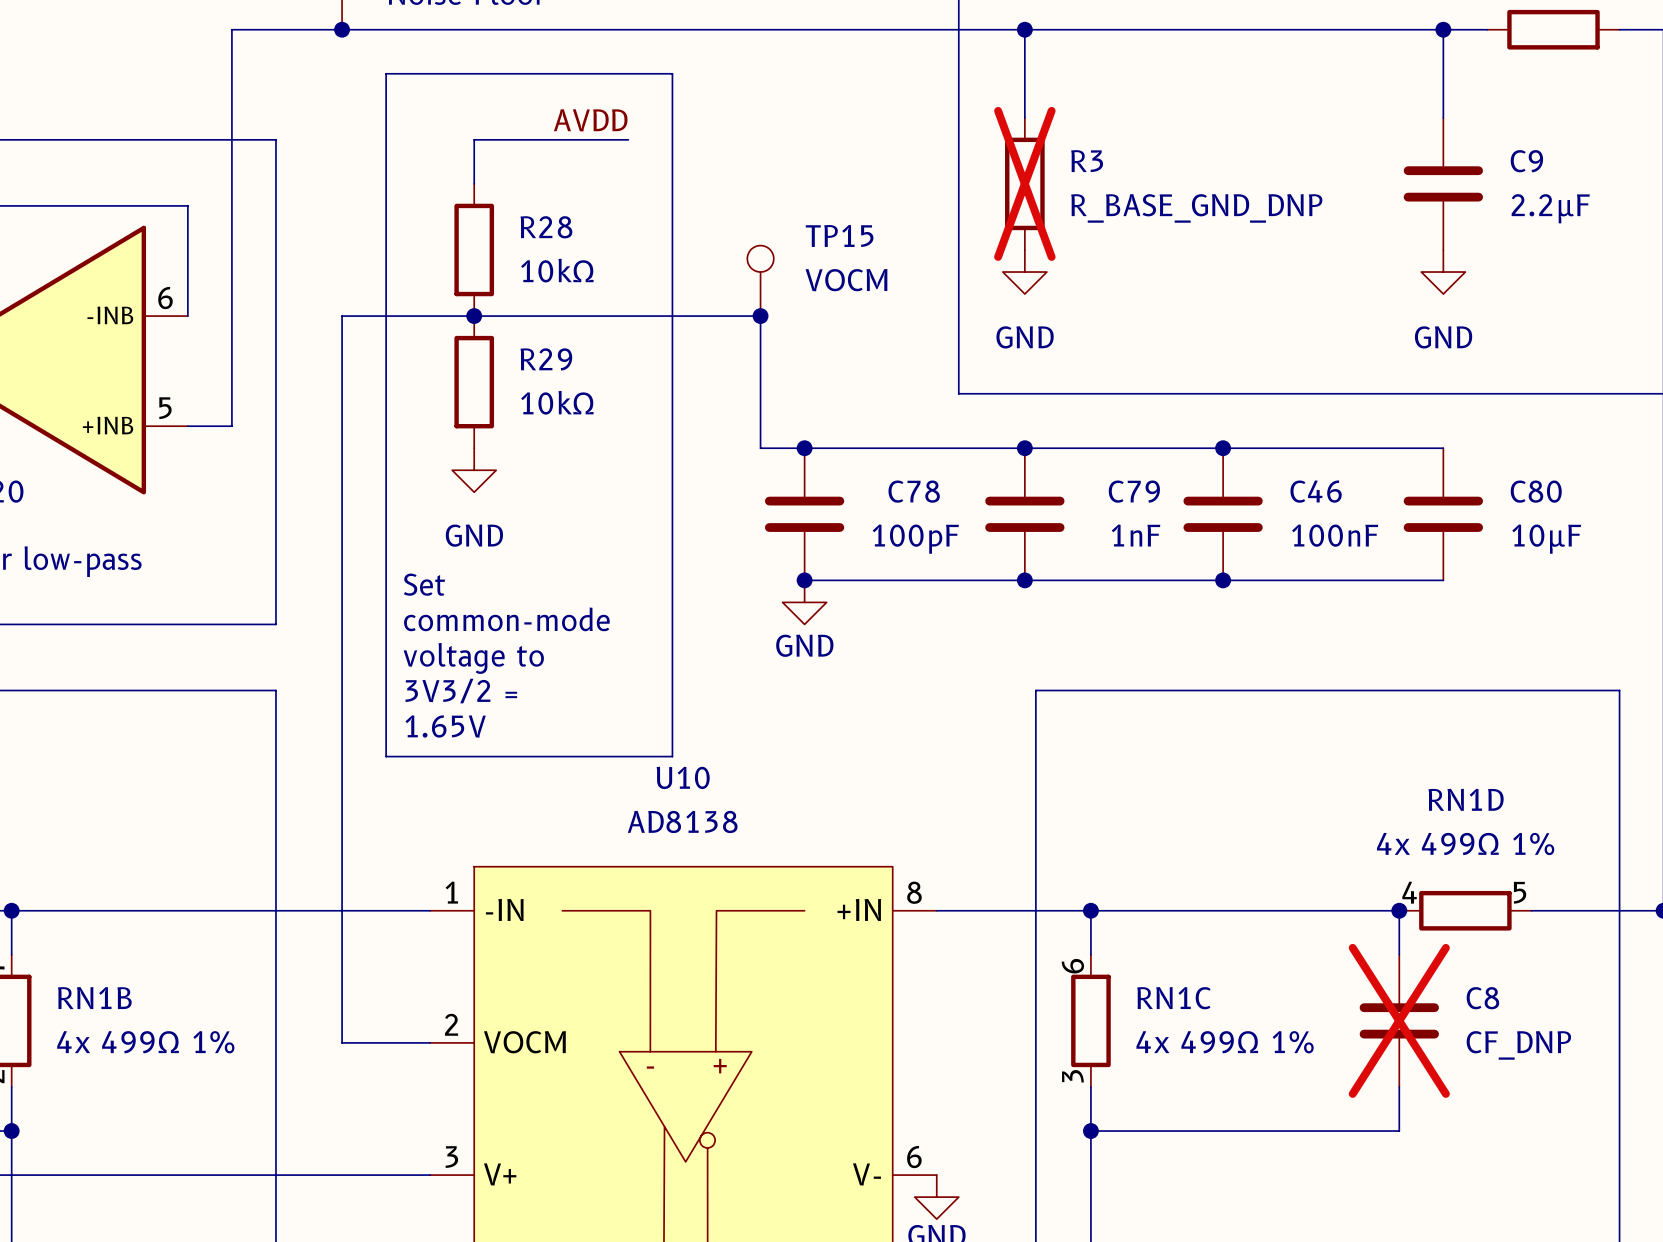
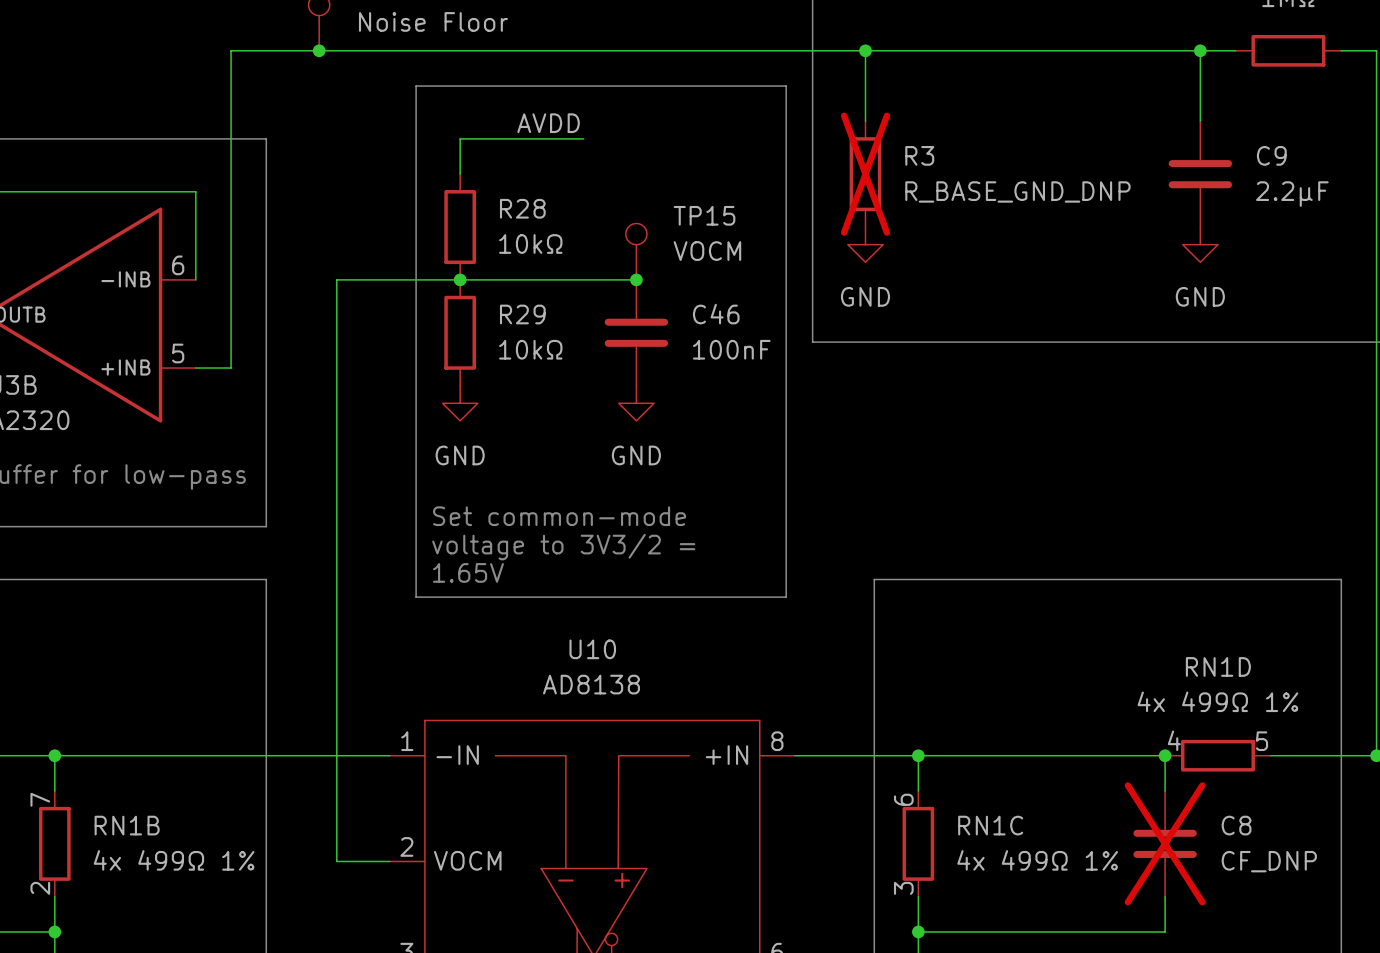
line: (463, 73) (386, 73) (386, 756) (672, 756) (672, 73) -> (416, 86) (416, 597) (786, 597) (786, 86) (583, 86)
label position: AVDD (590, 120) -> AVDD (548, 123)
wire: (518, 139) (474, 139) (474, 183) -> (460, 138) (460, 174)
wire: none -> (548, 138) (583, 138)
R28 position: (474, 249) -> (460, 227)
TP15 position: (760, 280) -> (636, 251)
wire: (364, 316) (342, 316) (342, 1042) (364, 1042) -> (336, 279) (336, 861)
junction position: (474, 316) -> (460, 279)
wire: (738, 316) (760, 316) (760, 448) (1443, 448) -> none
junction position: (760, 316) -> (636, 279)
R29 position: (474, 382) -> (460, 332)
junction: (804, 448) -> none
junction: (1024, 448) -> none
junction: (1223, 448) -> none
power symbol position: GND (474, 470) -> GND (460, 403)
power symbol: none -> GND (636, 403)
C78: 100pF (804, 514) -> none
C79: 1nF (1024, 514) -> none
C46 position: (1223, 514) -> (636, 332)
C80: 10µF (1443, 514) -> none
wire: (804, 580) (1443, 580) -> none
junction: (804, 580) -> none
junction: (1024, 580) -> none
junction: (1223, 580) -> none
text: Set (424, 584) -> none
power symbol: GND (804, 602) -> none
text: common-mode (506, 619) -> Set common-mode (559, 516)
text: voltage to (473, 658) -> voltage to 3V3/2 = (563, 547)
text: 3V3/2 = (461, 691) -> none
text position: 1.65V (445, 726) -> 1.65V (468, 572)

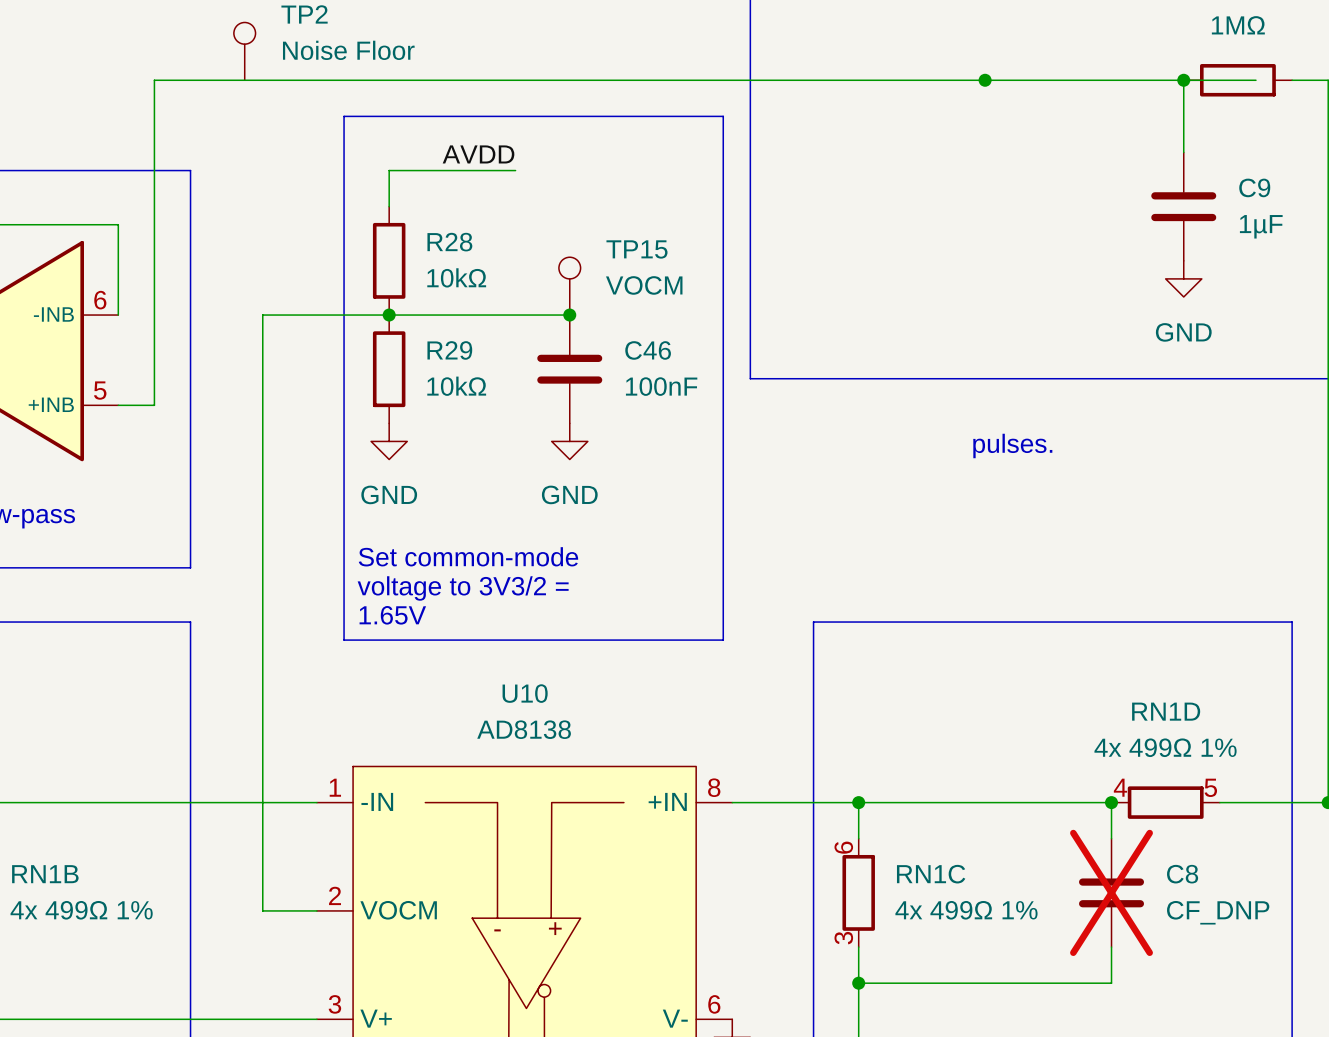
junction: (319, 50) -> none
wire: (865, 50) (865, 121) -> none
junction: (865, 50) -> none
junction: none -> (985, 80)
wire: (1200, 50) (1200, 121) -> none
junction position: (1200, 50) -> (1183, 80)
wire: none -> (1255, 80) (1183, 80) (1183, 152)
R3: R_BASE_GND_DNP (865, 174) -> none
C9 position: (1200, 174) -> (1183, 206)
C9 value: 2.2µF (1292, 194) -> 1µF (1261, 226)
power symbol: GND (865, 244) -> none
power symbol position: GND (1200, 244) -> GND (1183, 278)
text: none -> pulses. (1012, 445)

